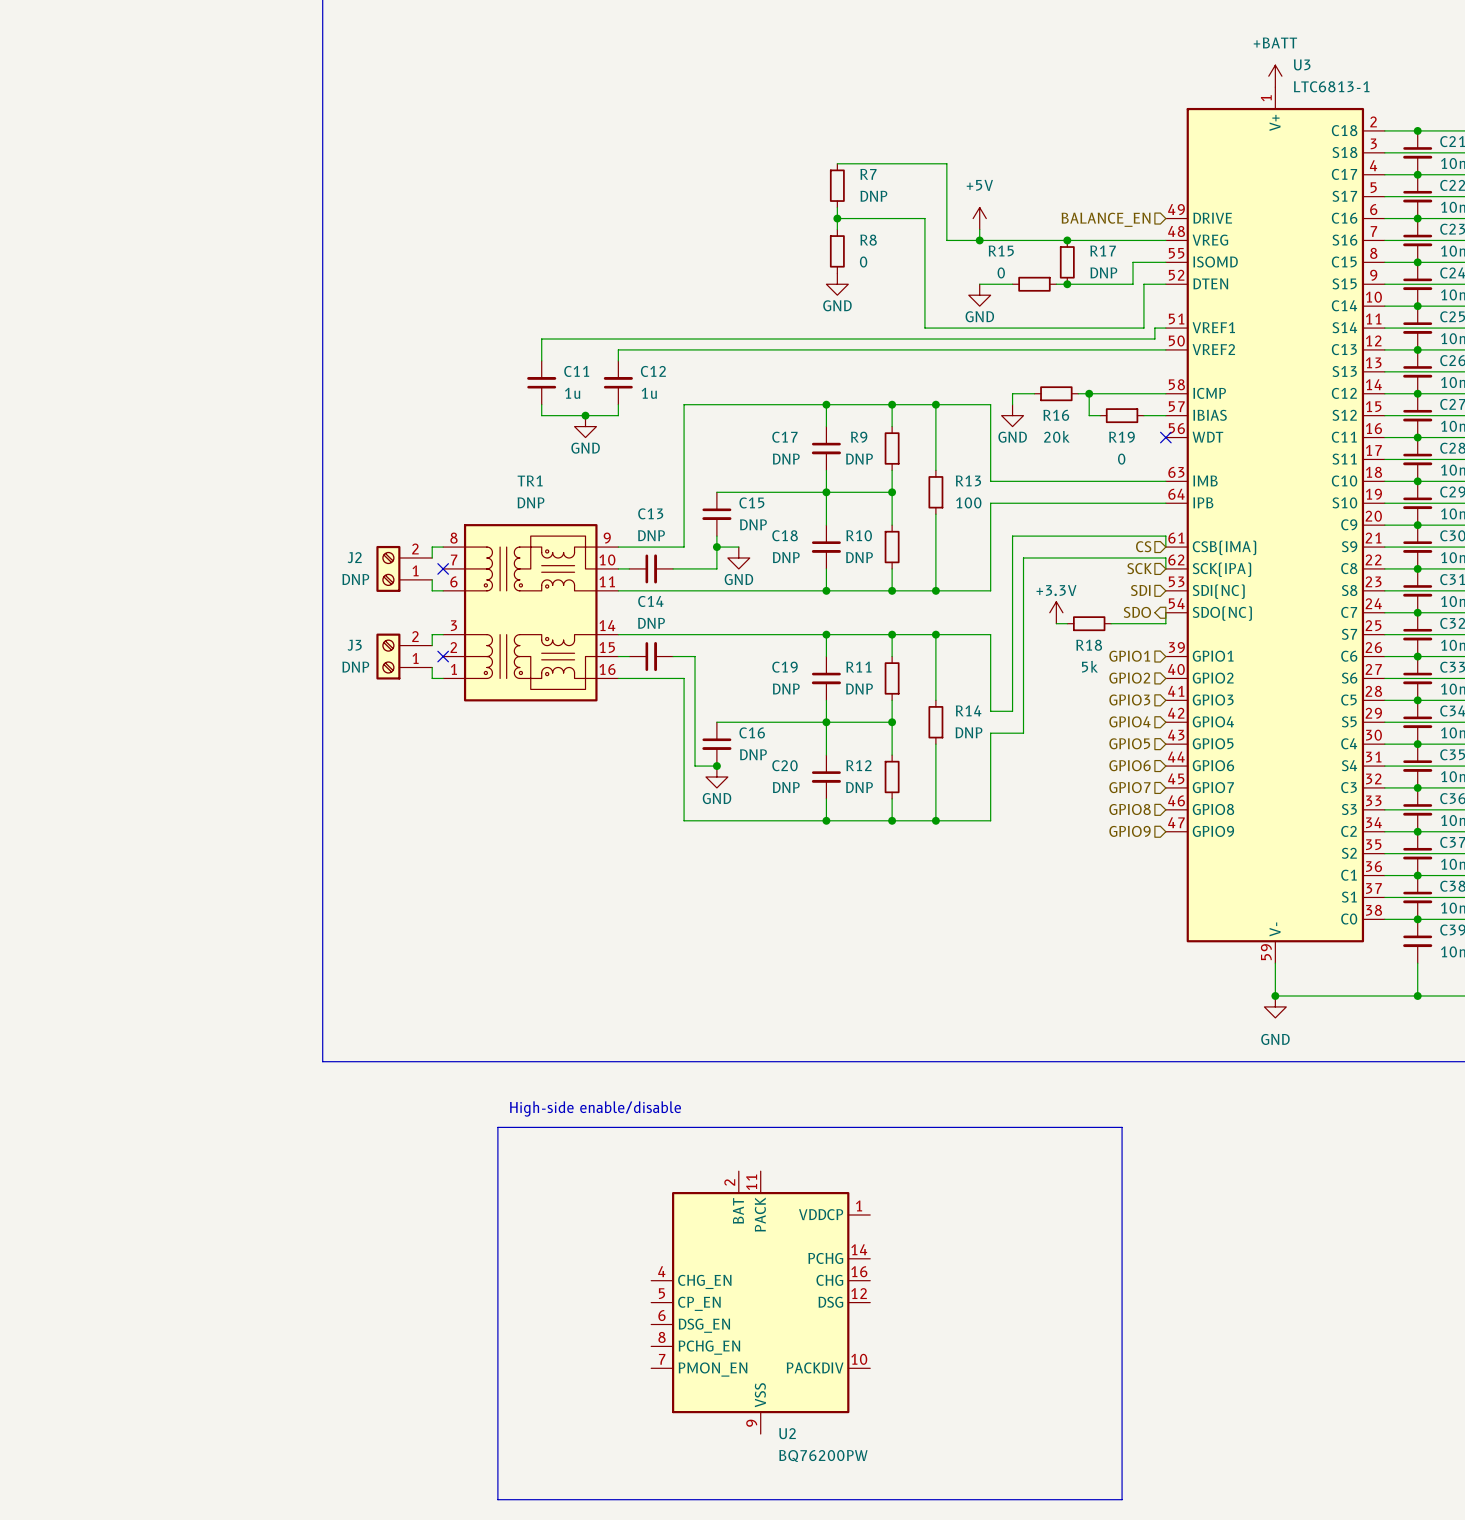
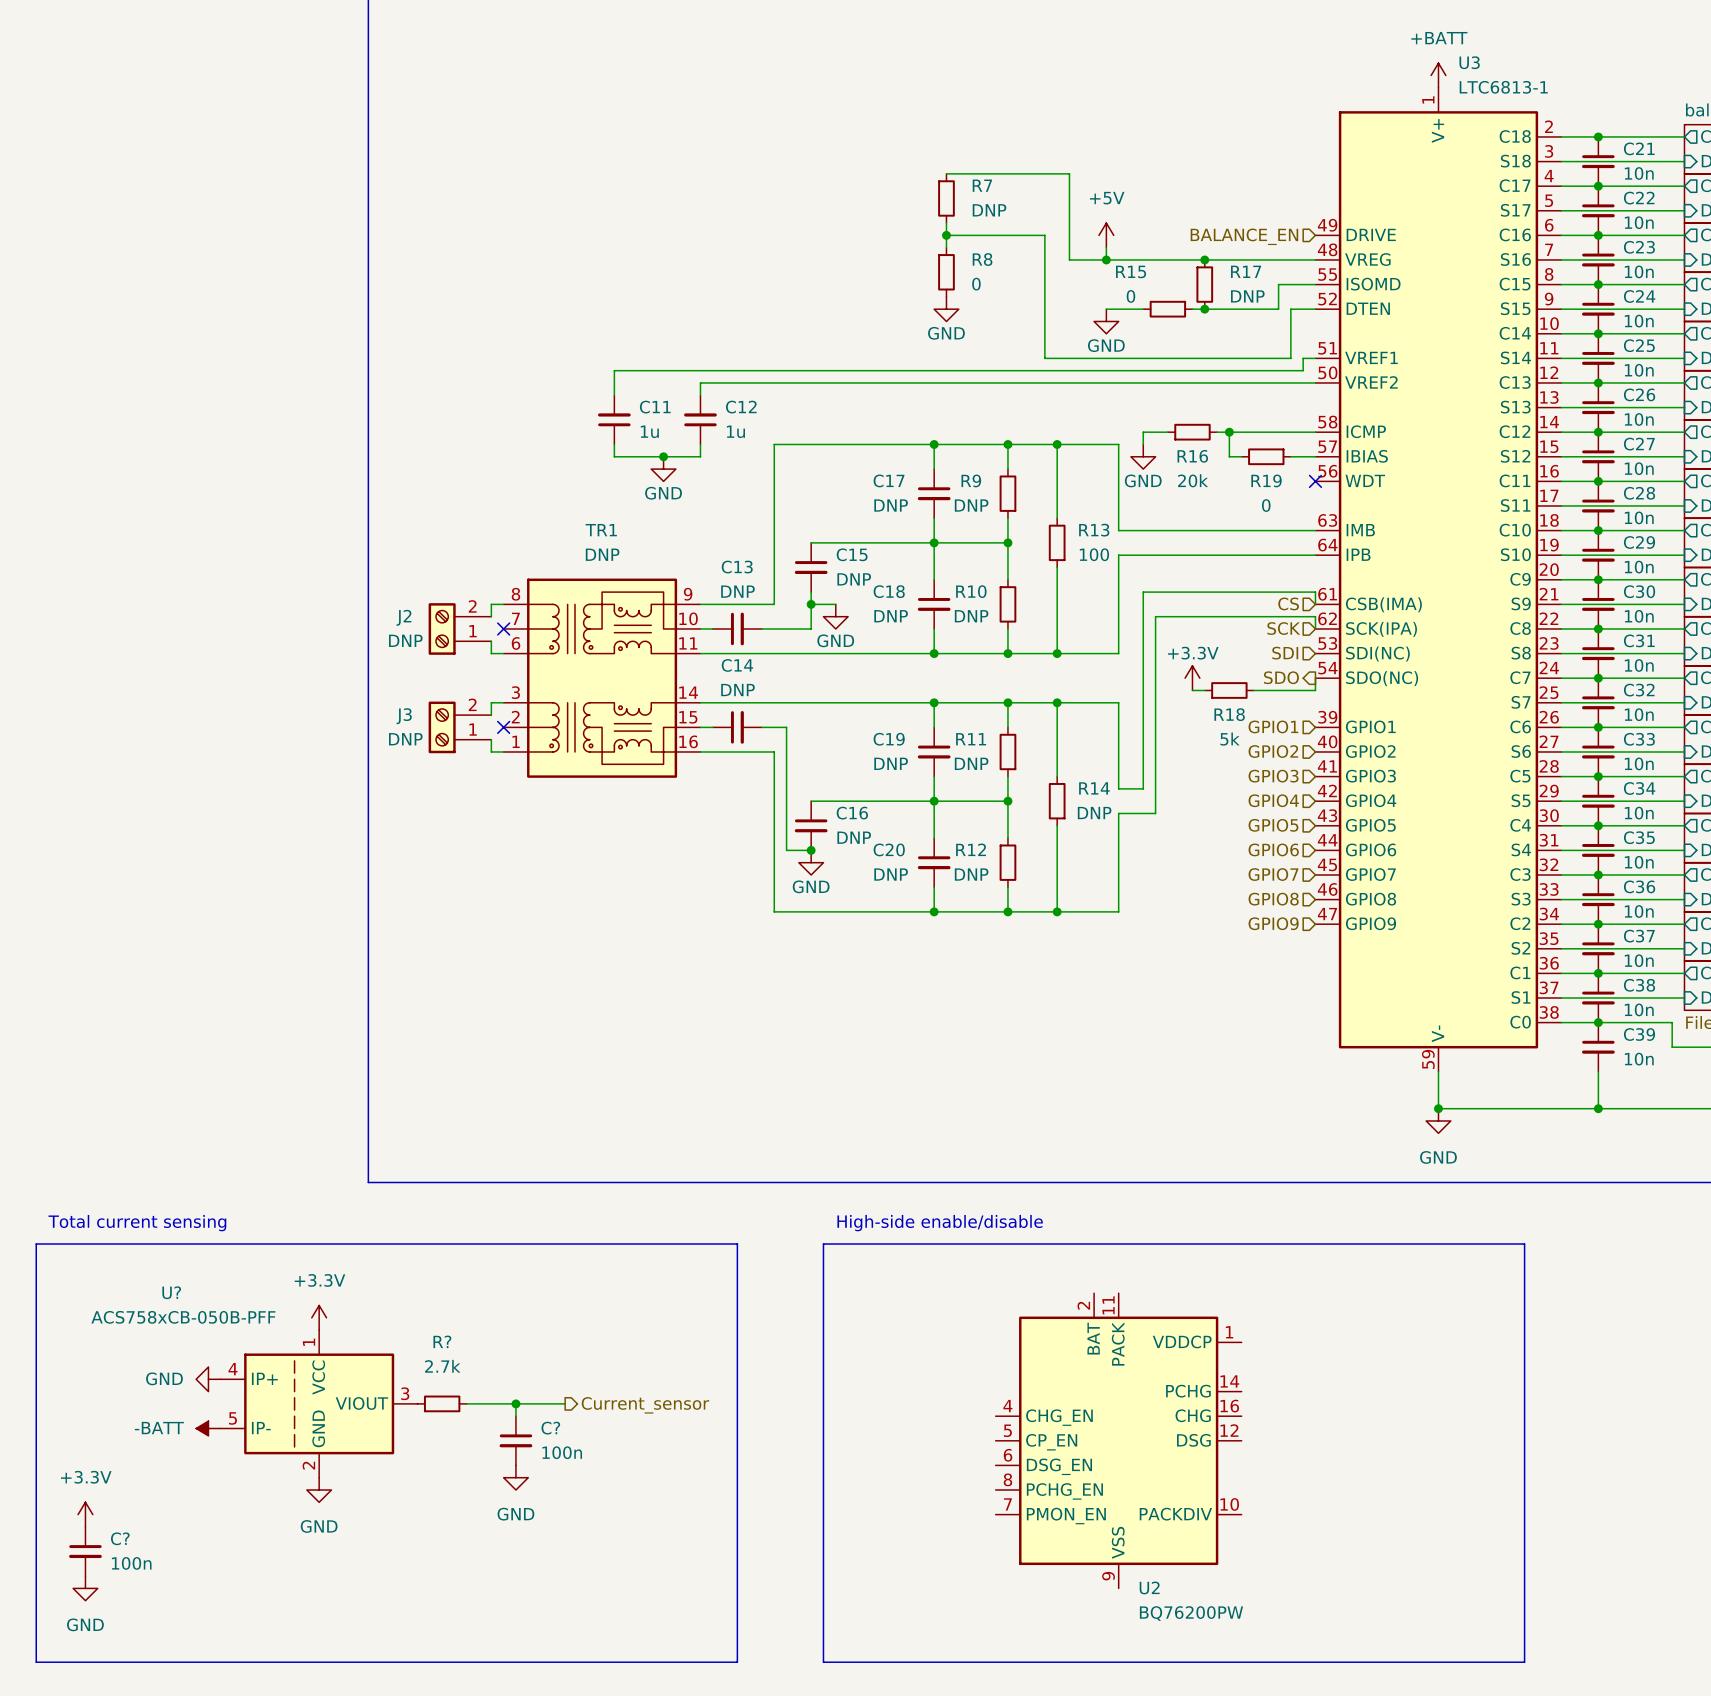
text: none -> Total current sensing (137, 1223)
text: none -> High-side enable/disable (940, 1223)
text: High-side enable/disable (595, 1108) -> none
line: none -> (36, 1244) (737, 1244) (737, 1662) (36, 1662) (36, 1244)
line: none -> (823, 1244) (1524, 1244) (1524, 1662) (823, 1662) (823, 1244)
line: (497, 1127) (497, 1499) (1122, 1499) (1122, 1127) (497, 1127) -> none
power symbol: none -> +3.3V (319, 1317)
power symbol: none -> GND (208, 1379)
U?: none -> ACS758xCB-050B-PFF (319, 1403)
R?: none -> 2.7k (442, 1403)
wire: none -> (466, 1403) (565, 1403)
wire: none -> (515, 1403) (515, 1416)
junction: none -> (515, 1403)
hierarchical label: none -> Current_sensor (645, 1405)
power symbol: none -> -BATT (208, 1428)
C?: none -> 100n (515, 1440)
U2 position: (760, 1302) -> (1118, 1440)
power symbol: none -> GND (515, 1477)
power symbol: none -> GND (319, 1490)
power symbol: none -> +3.3V (85, 1514)
C?: none -> 100n (85, 1551)
power symbol: none -> GND (85, 1588)

